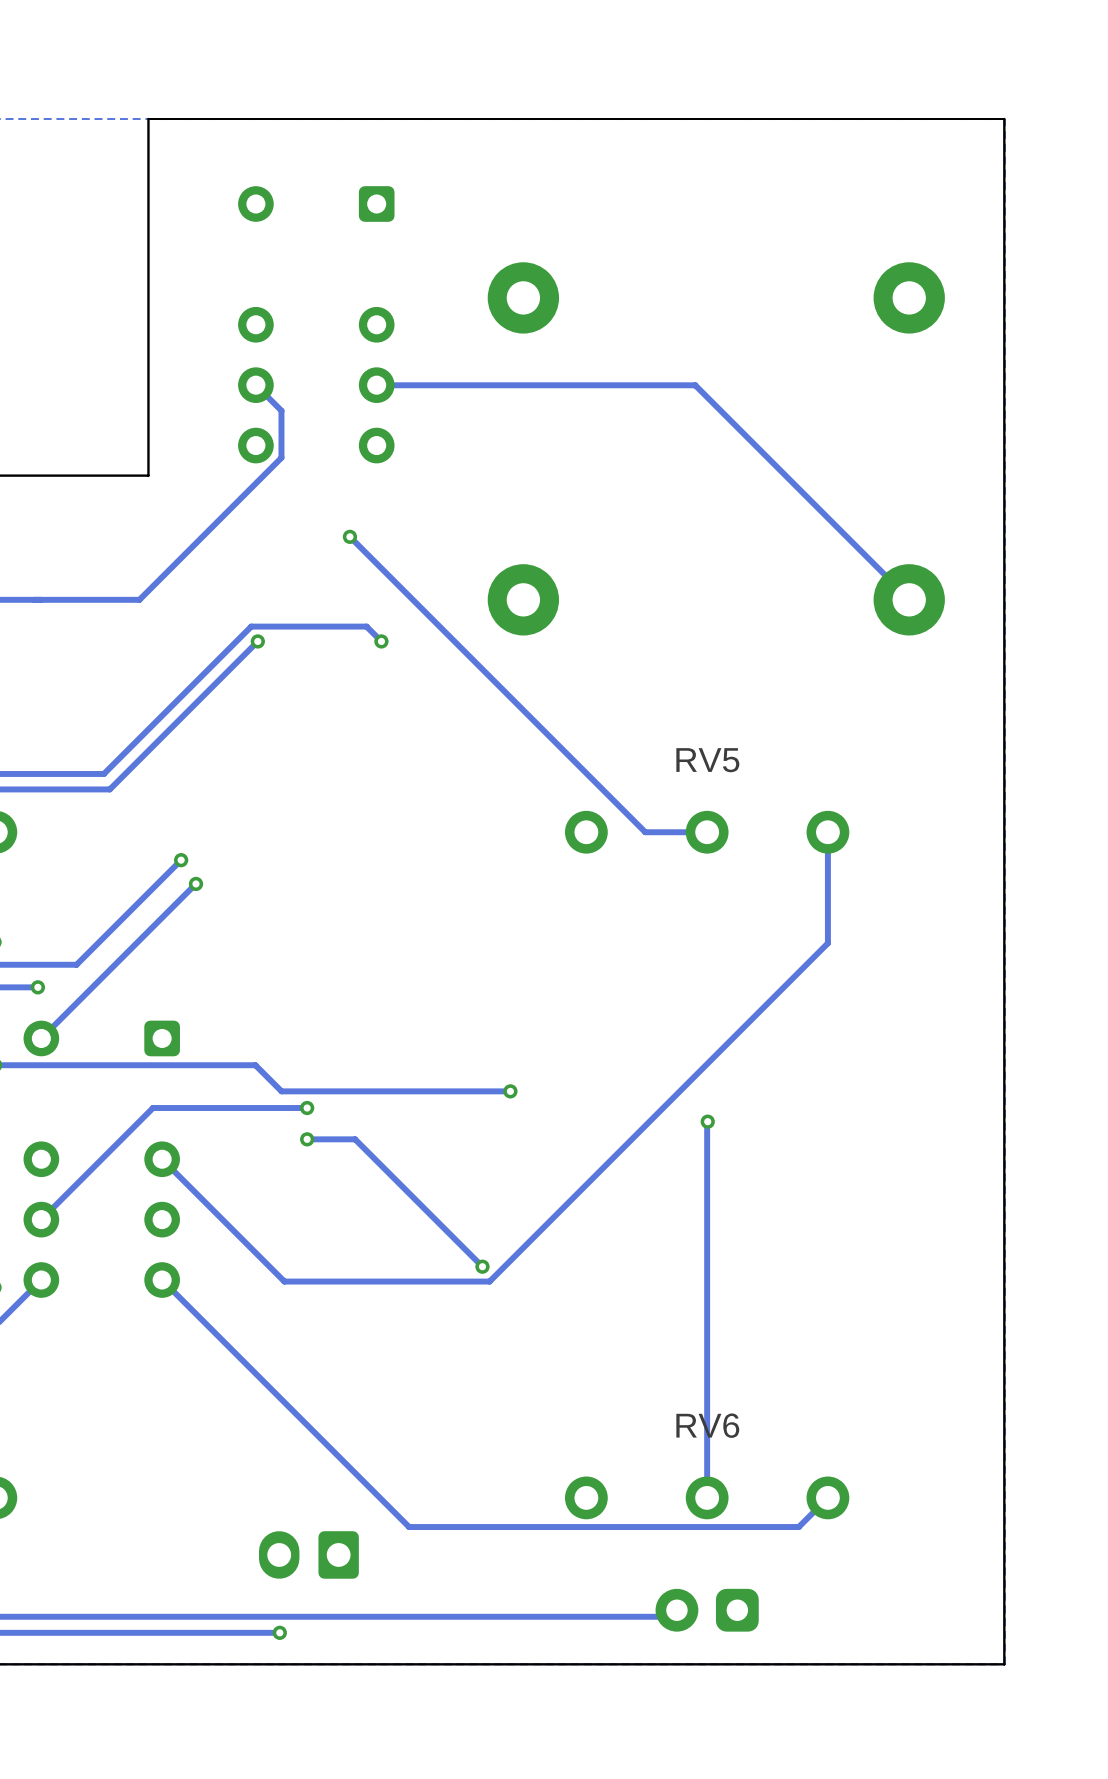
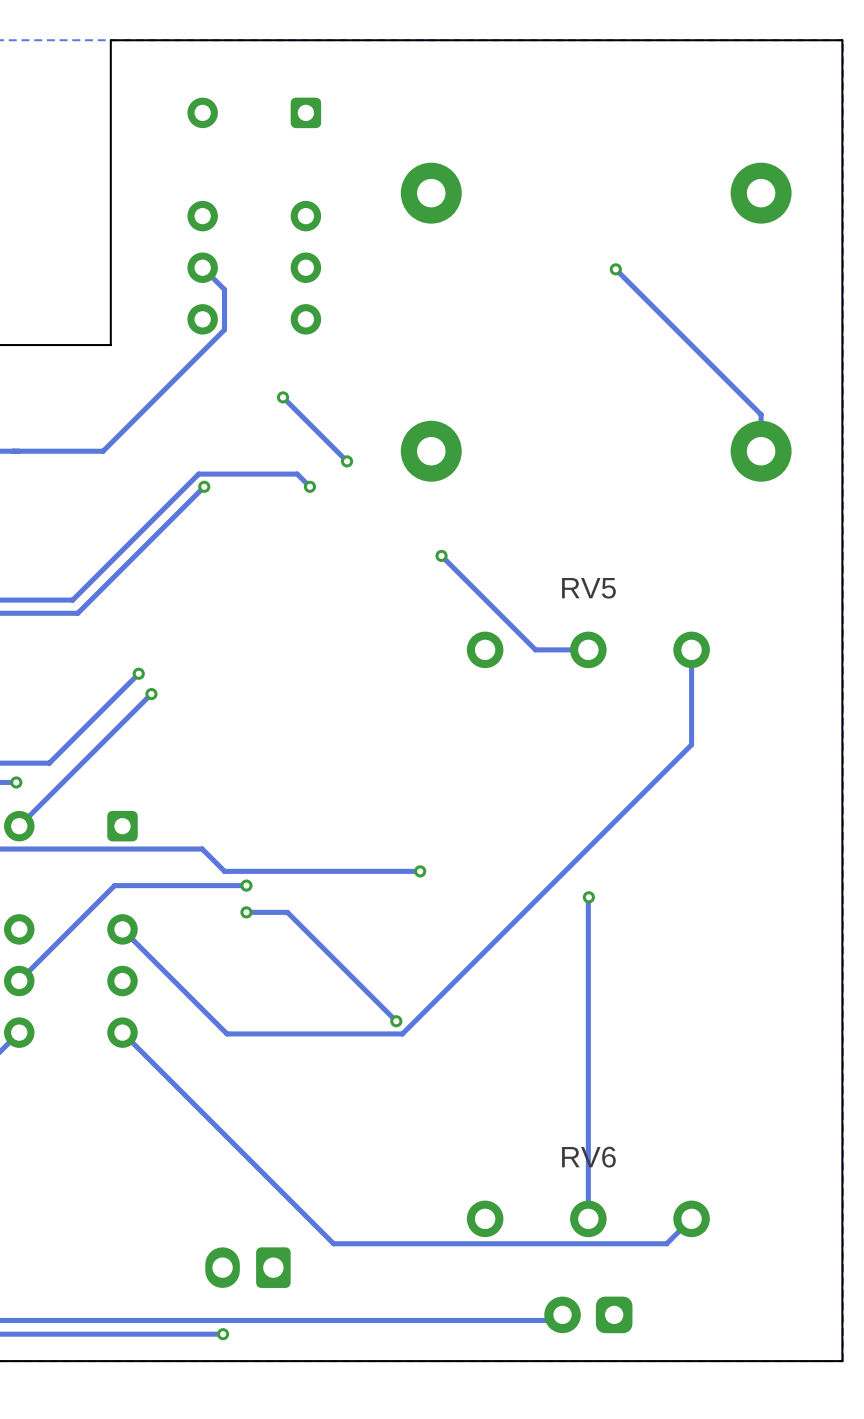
track: (376, 385) (695, 385) (909, 599) -> (615, 269) (761, 414) (761, 450)
via: none -> (615, 269)
track: (424, 611) (535, 722) -> none
via: none -> (347, 461)
via: none -> (441, 555)

